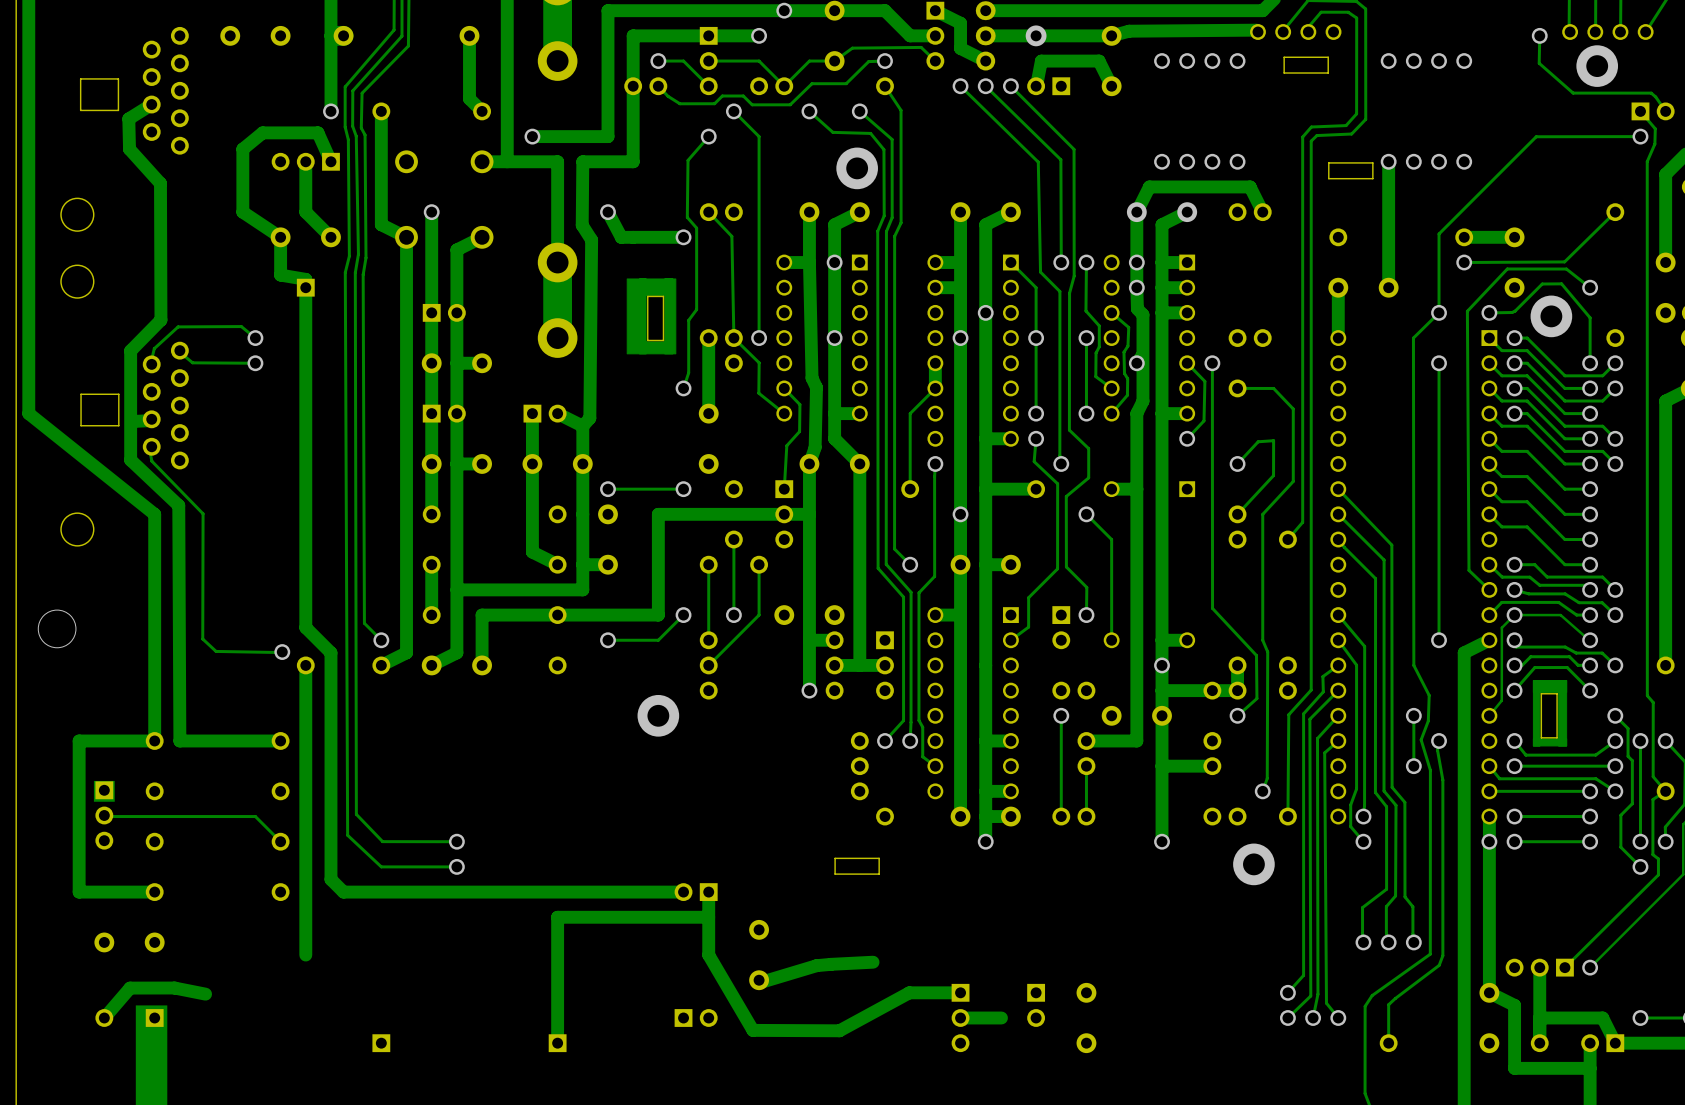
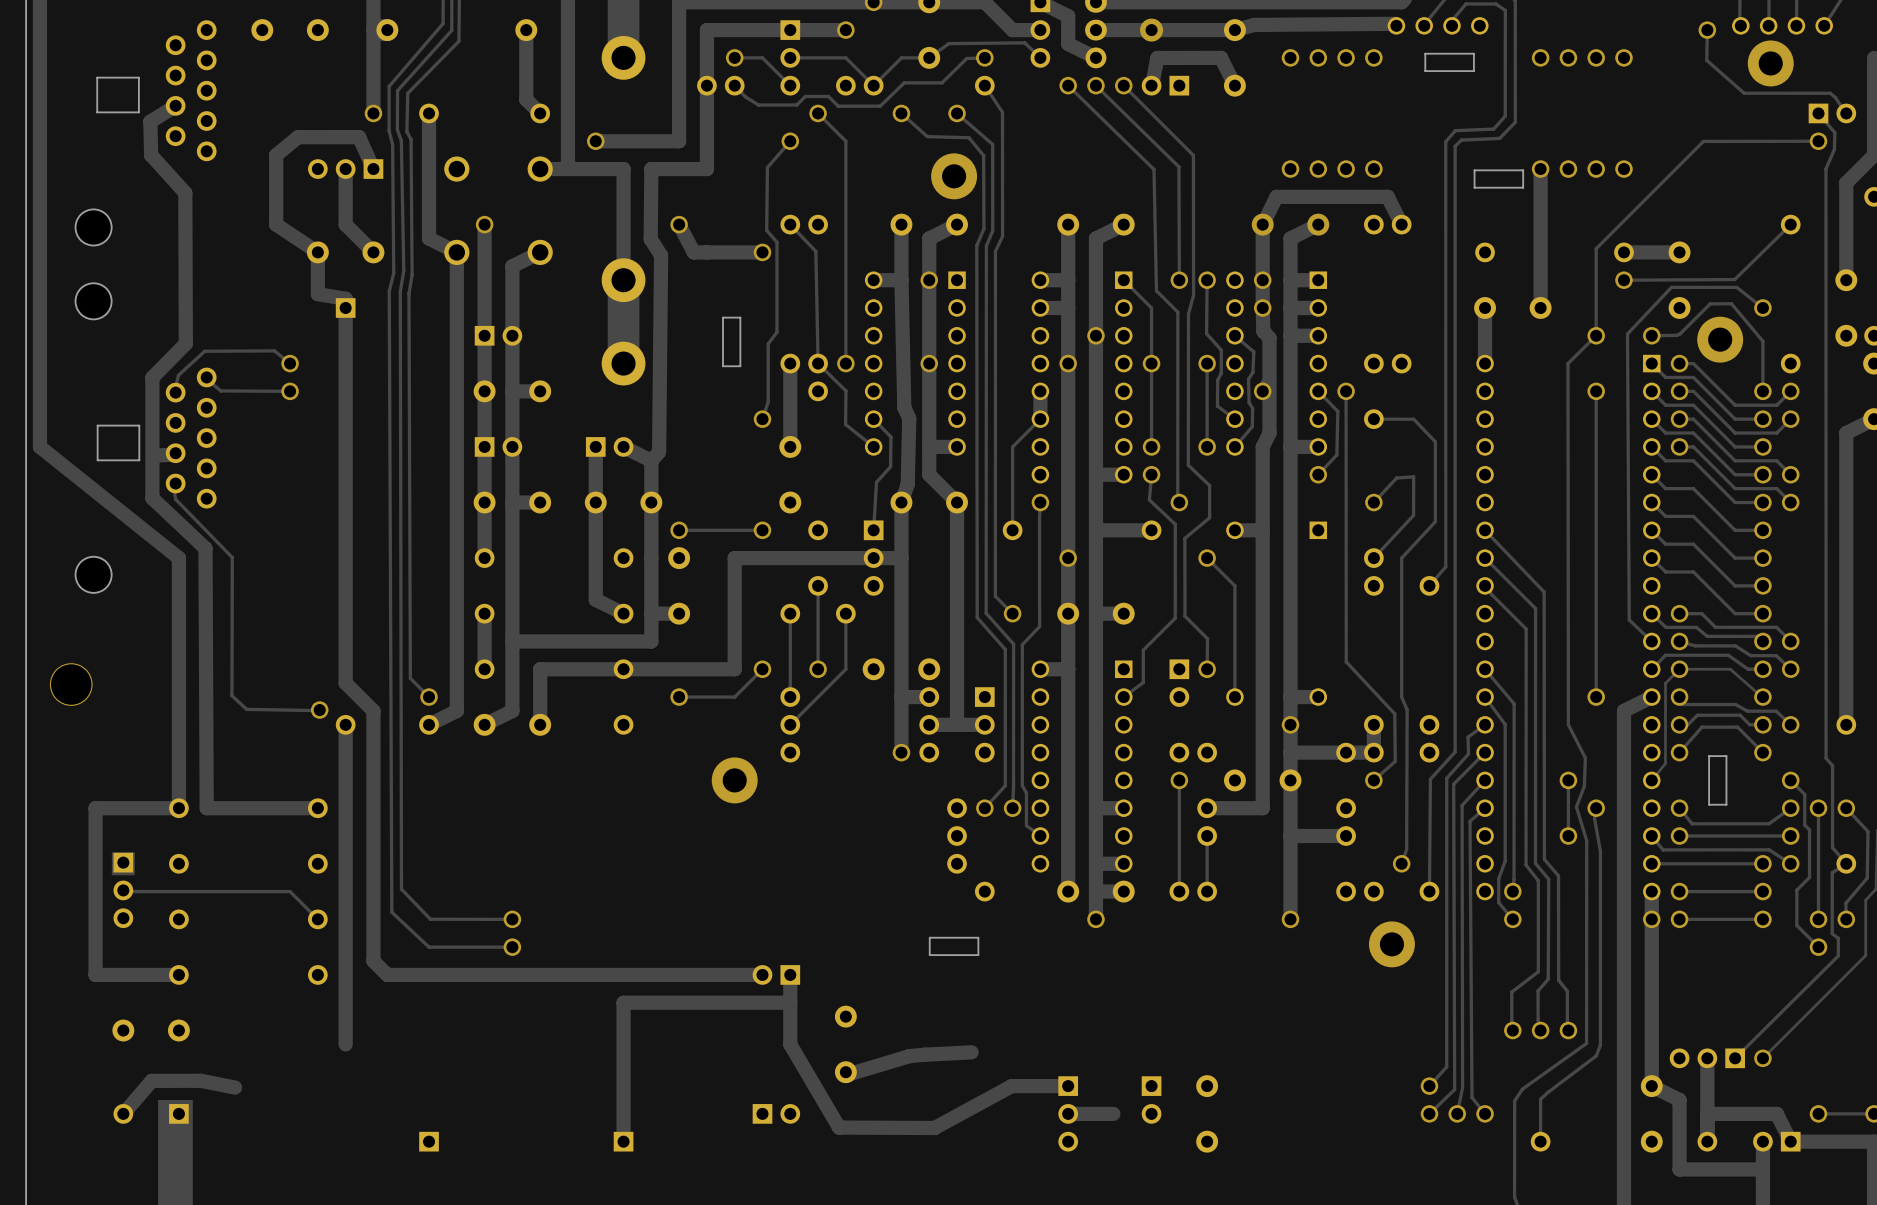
drawing: [626, 278, 677, 355] -> none
drawing: [1532, 680, 1568, 747] -> none

